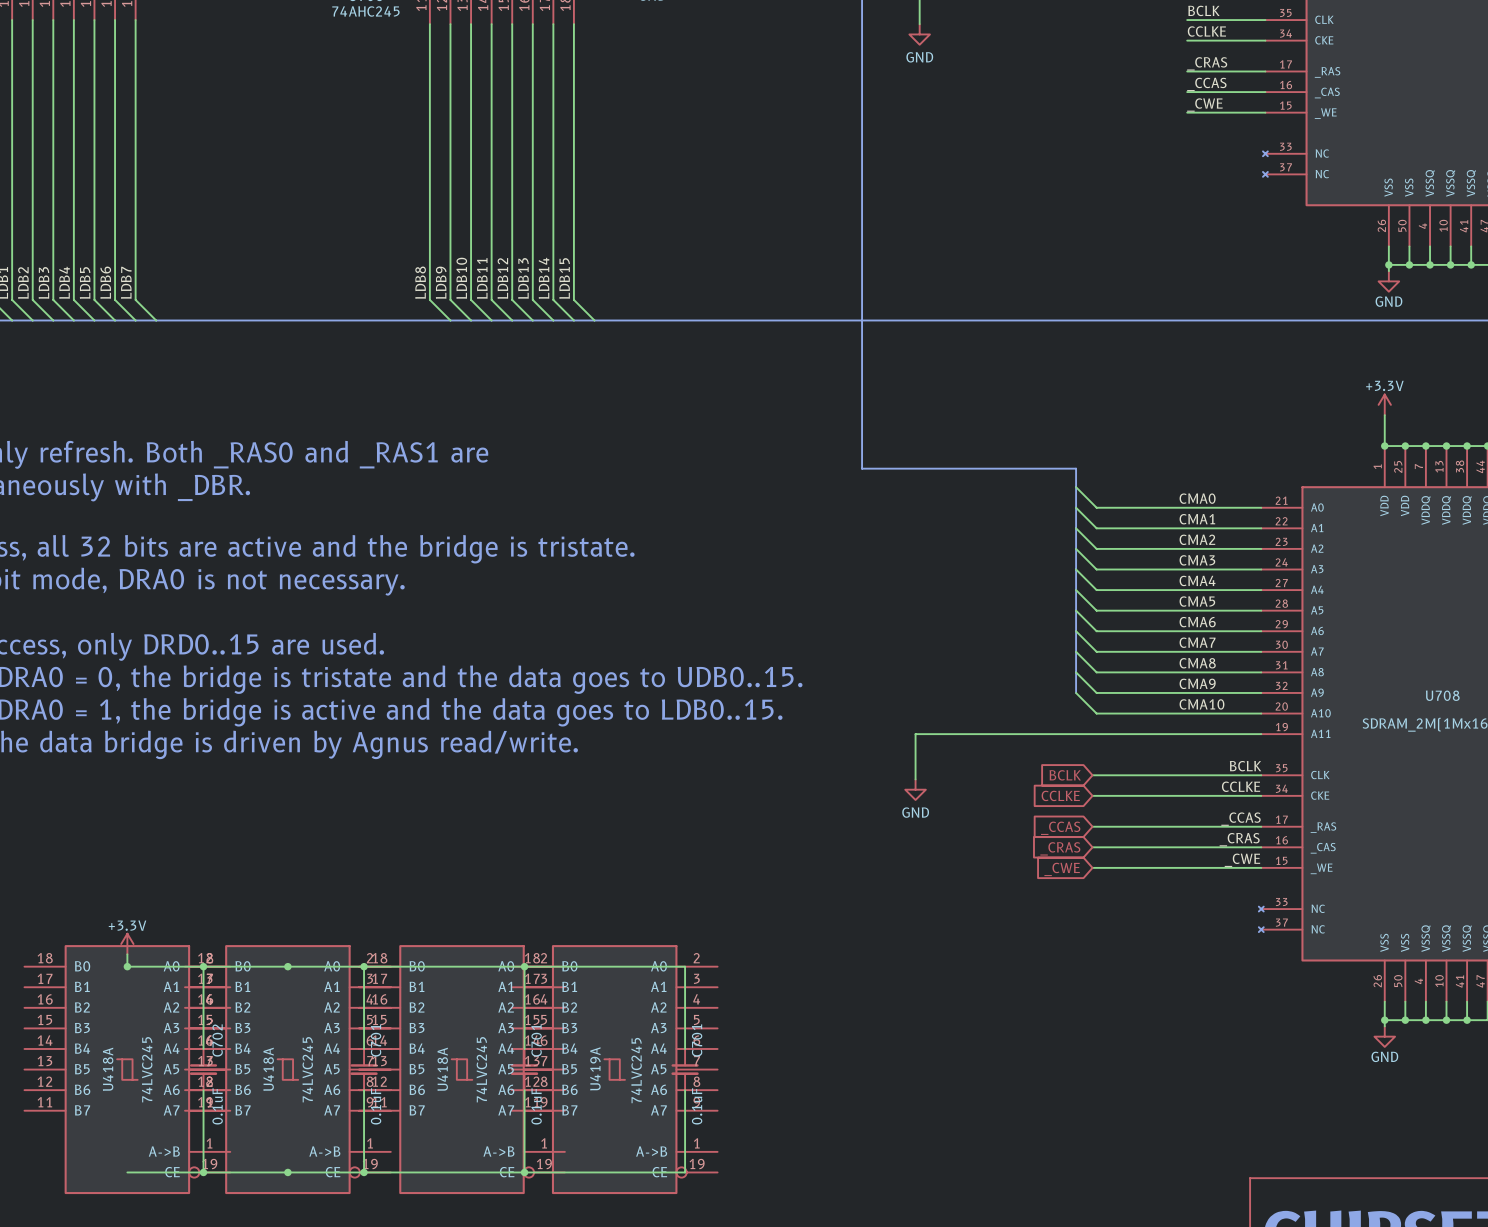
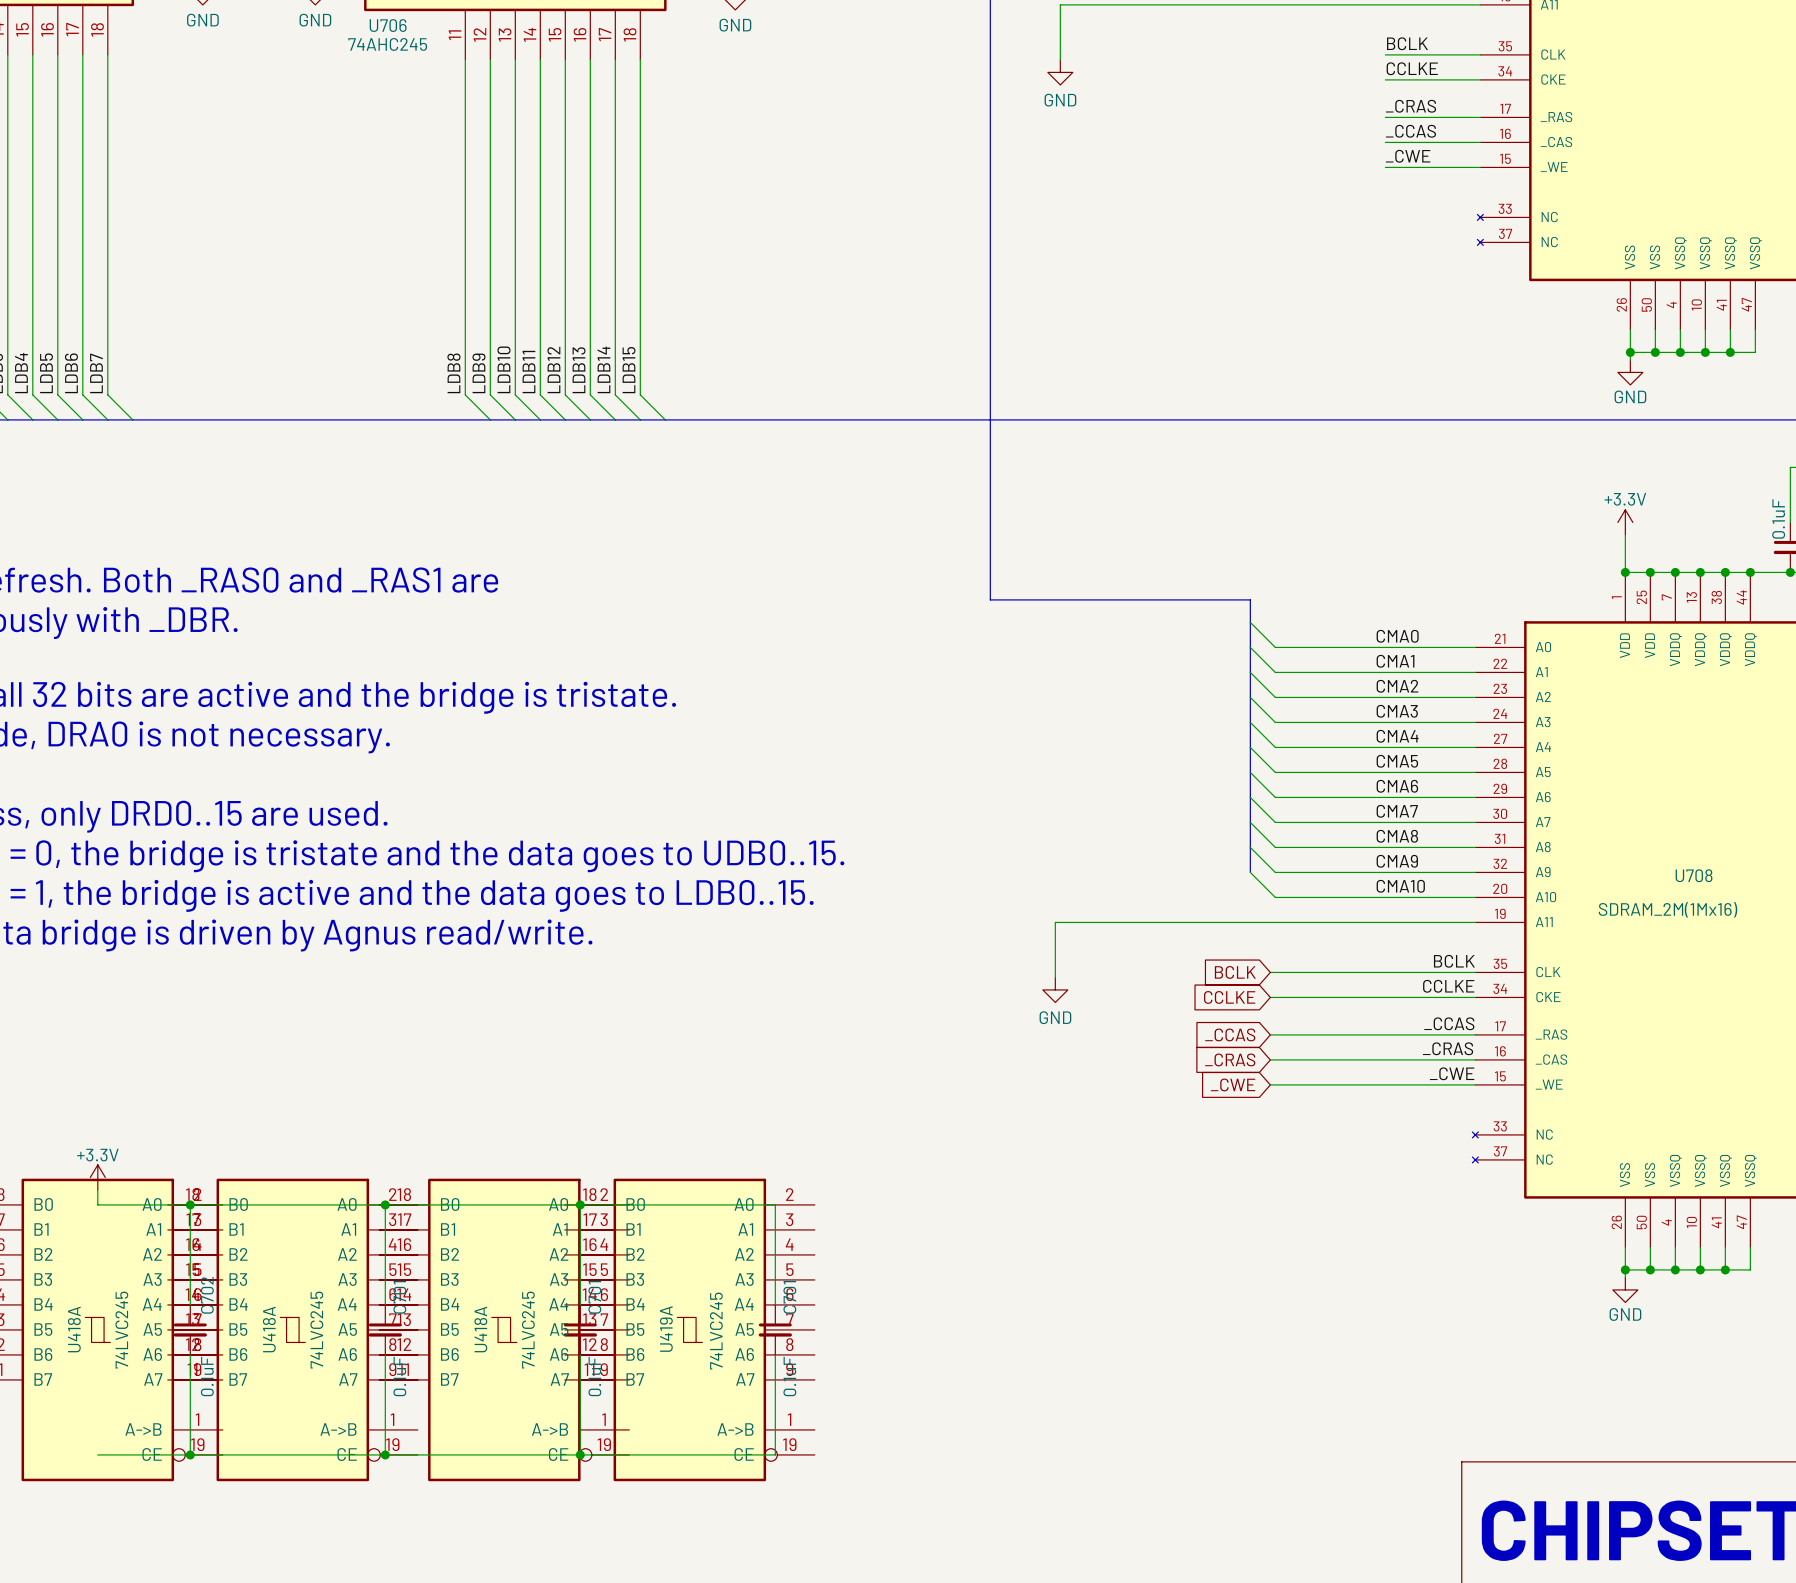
junction: (127, 966) -> none
junction: (287, 966) -> none
junction: (287, 1172) -> none

